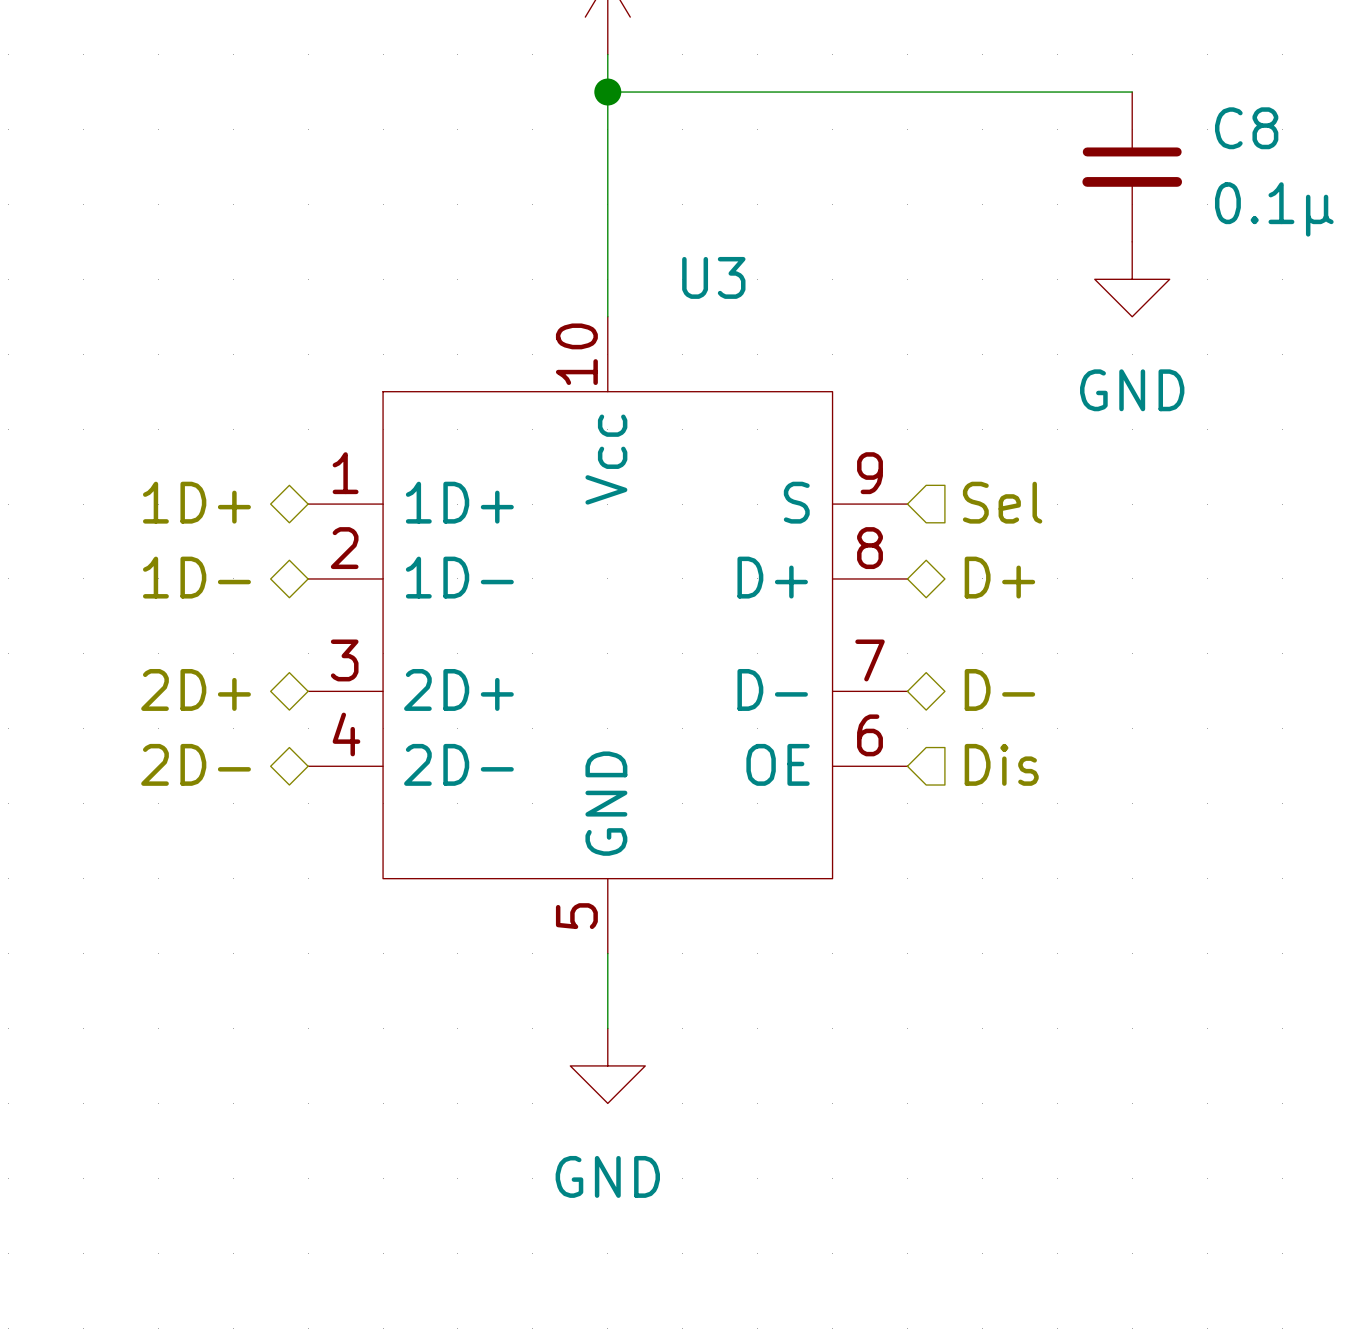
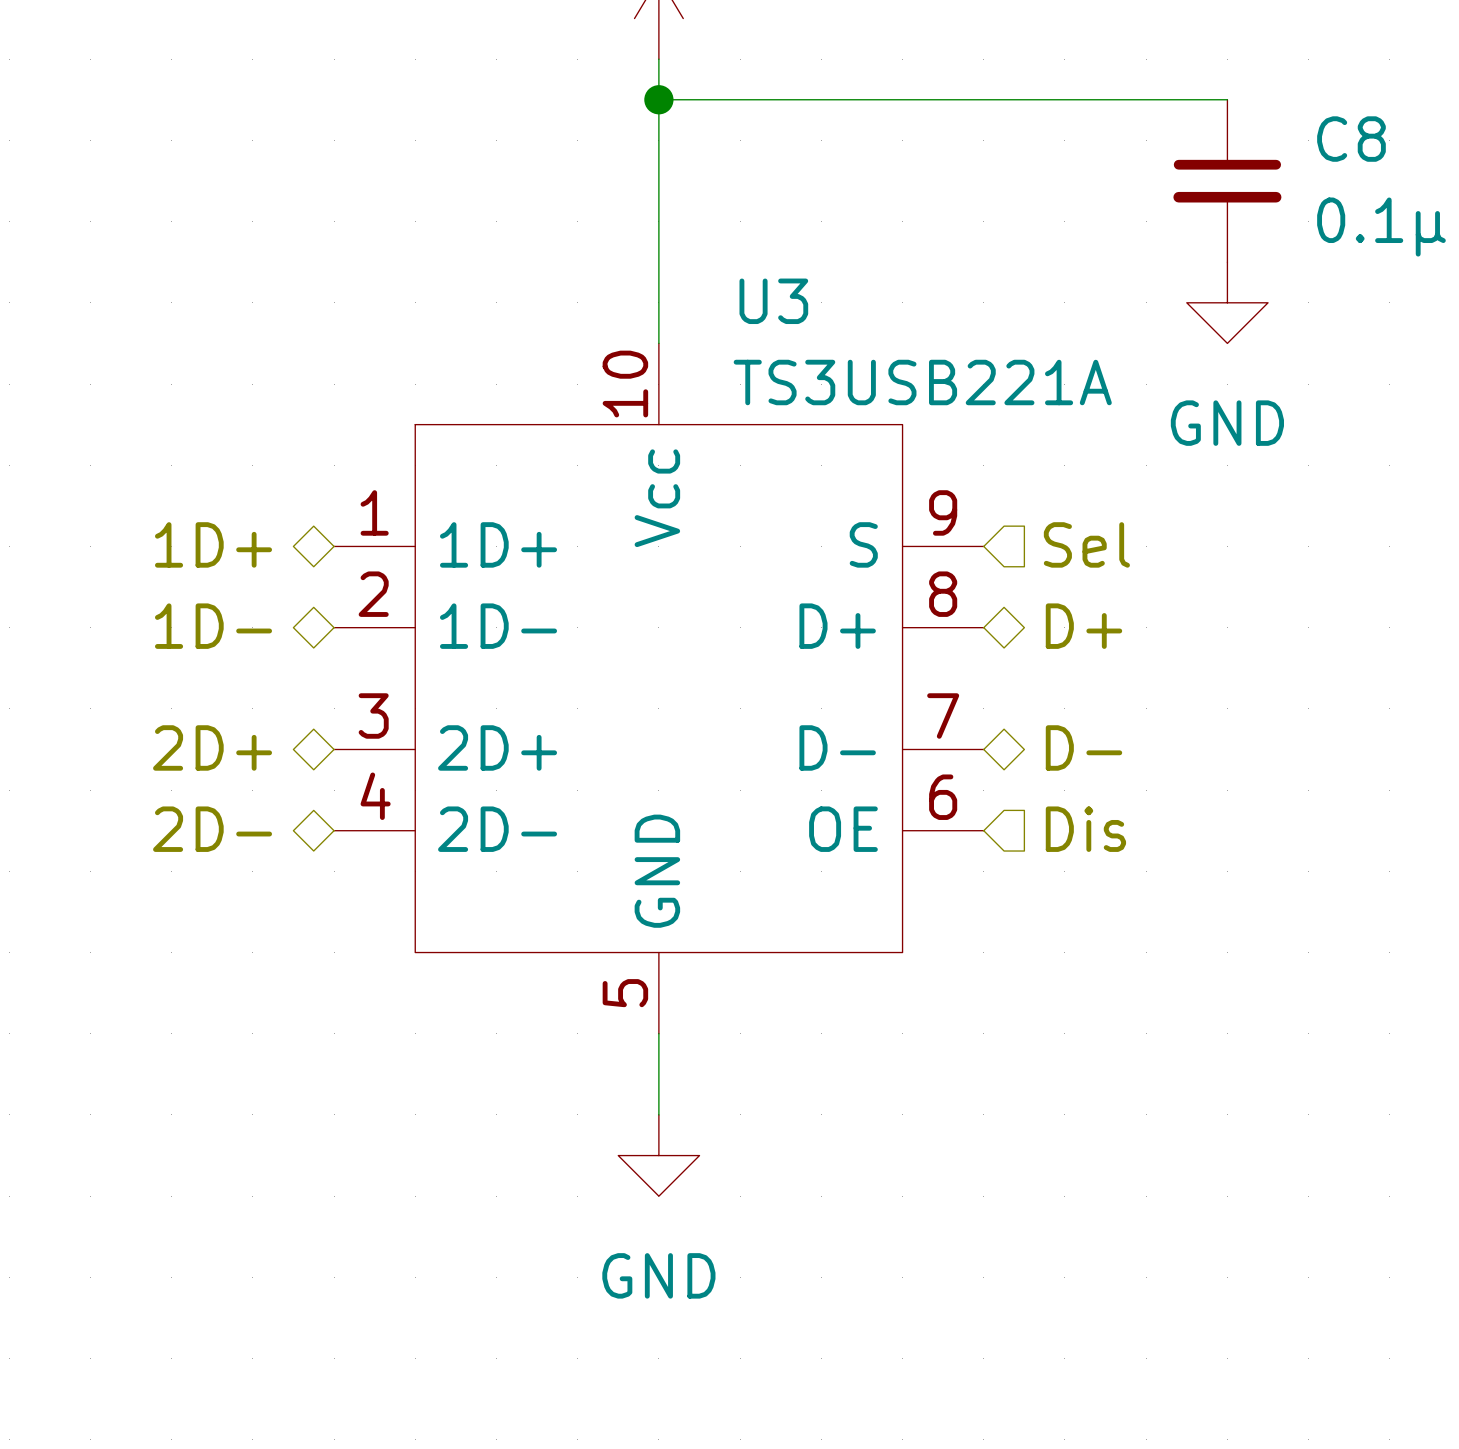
U3 value: none -> TS3USB221A (922, 382)

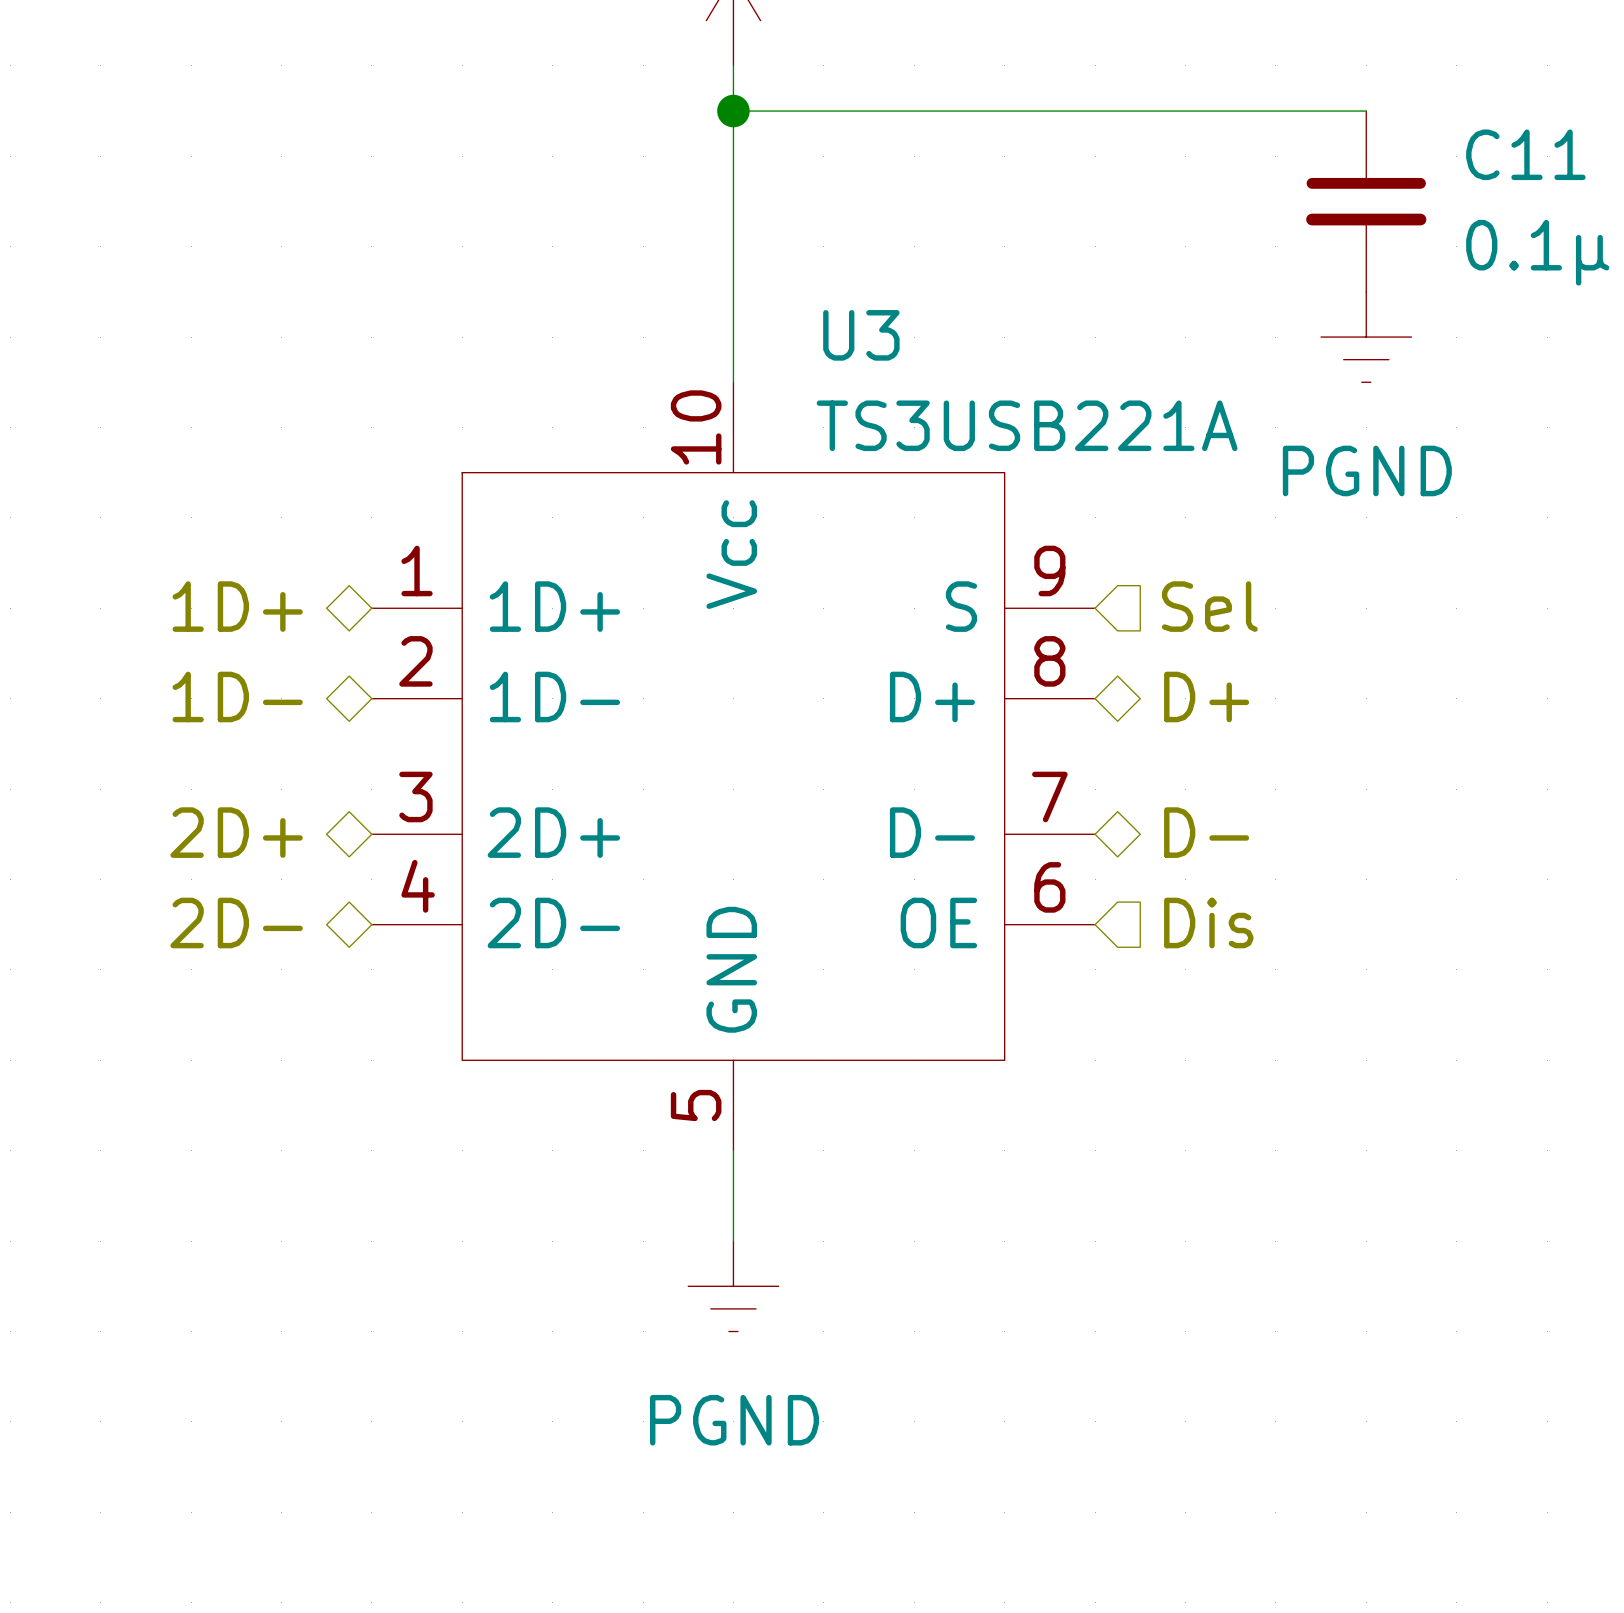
C8 name: C8 (1351, 139) -> C11 (1525, 154)
power symbol: GND (1227, 302) -> PGND (1366, 337)
power symbol: GND (658, 1155) -> PGND (733, 1286)

